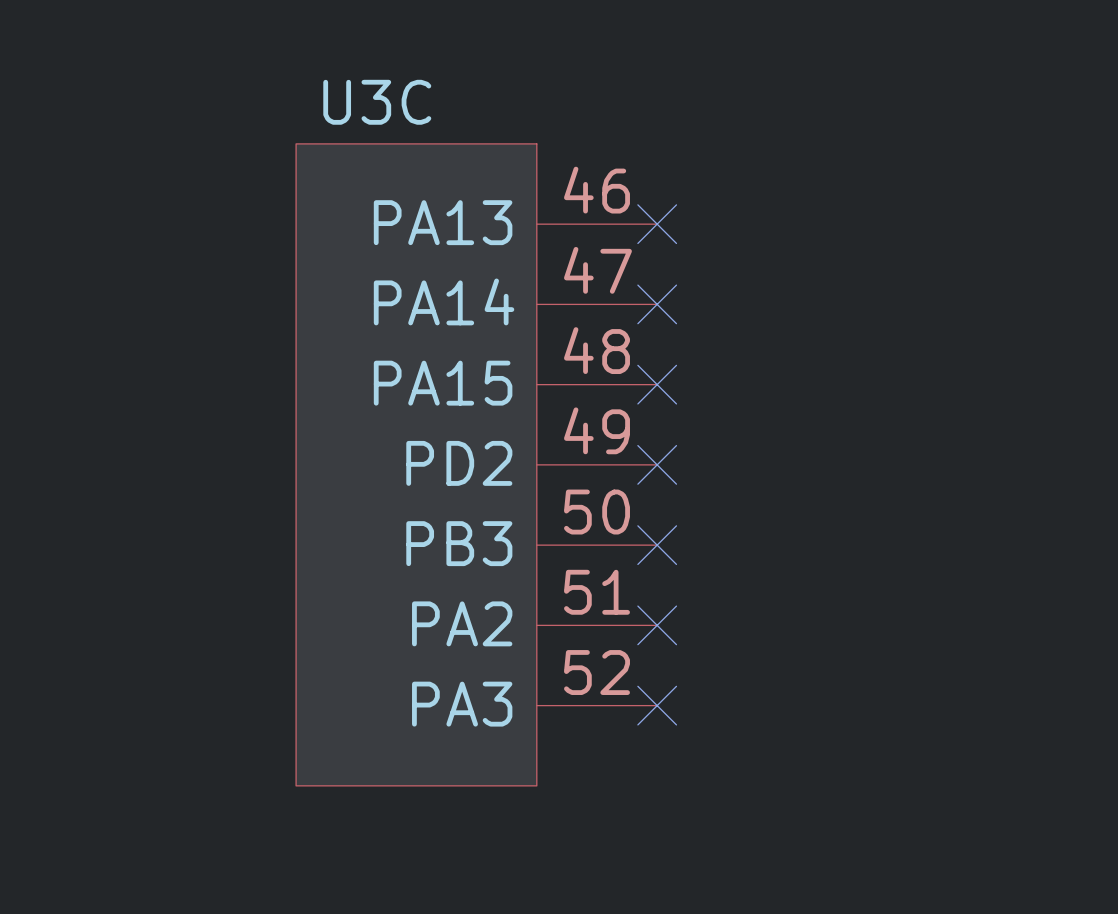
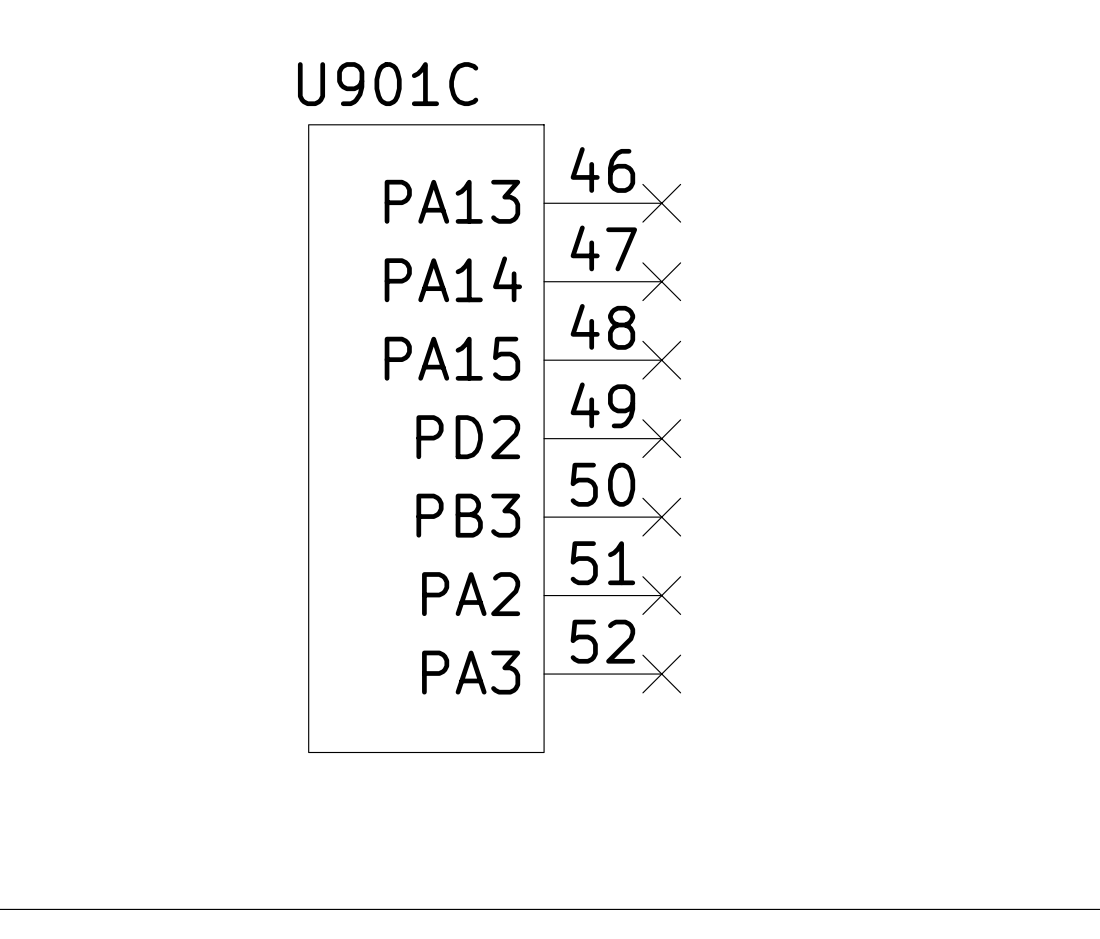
U3C name: U3C (377, 102) -> U901C (388, 84)

